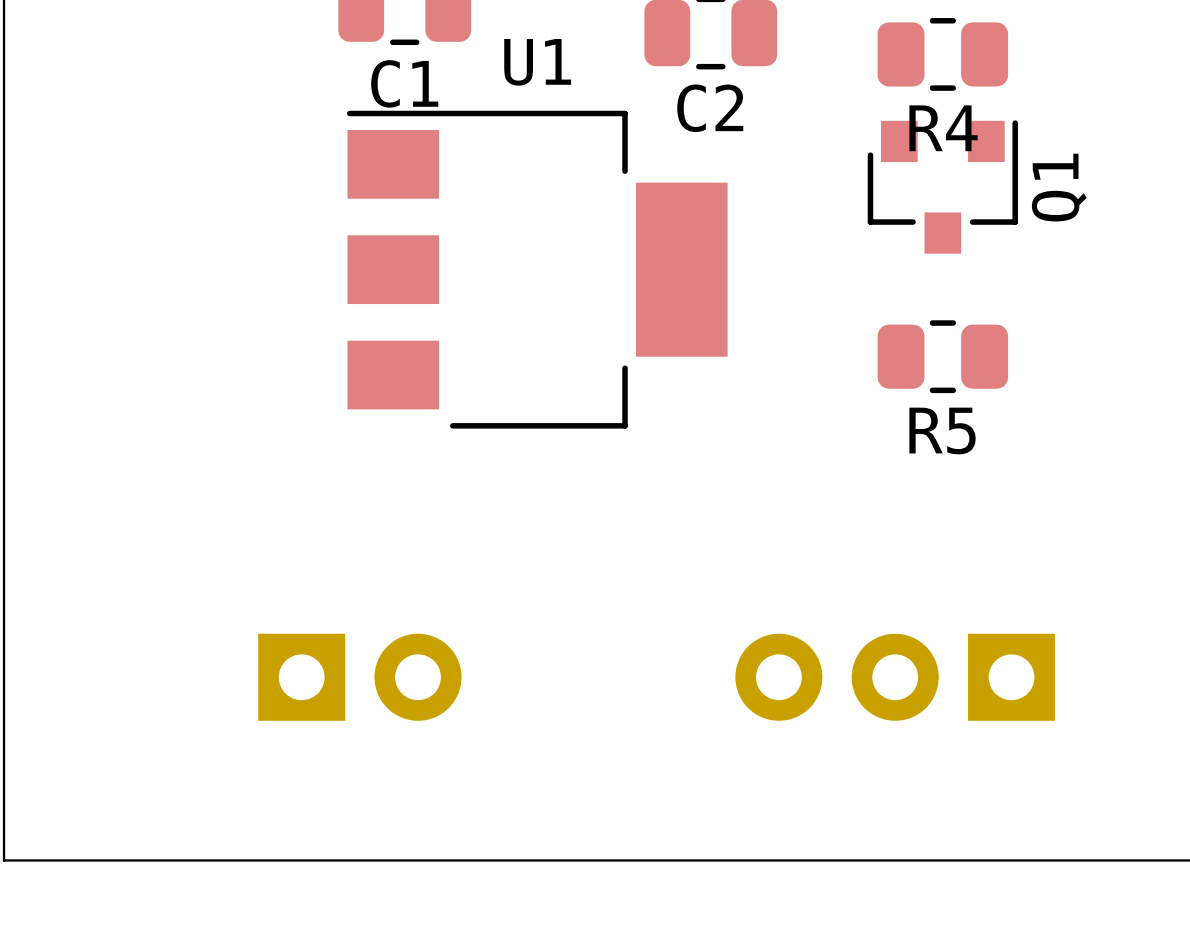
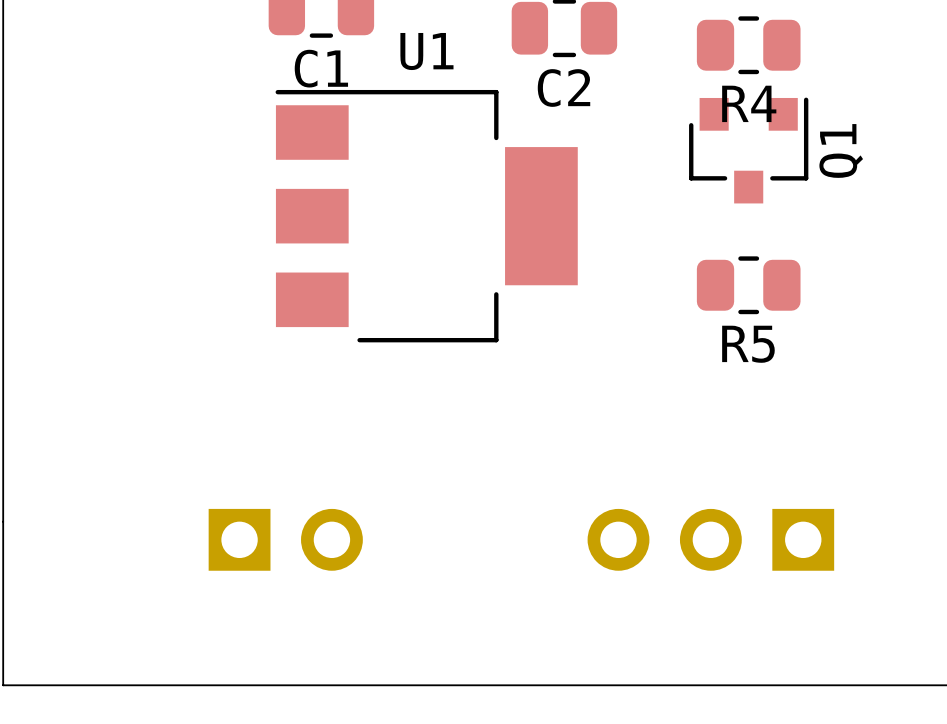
part footprint: [258, 633, 462, 721] -> [208, 508, 363, 571]
part footprint: [735, 633, 1056, 721] -> [587, 508, 835, 571]

